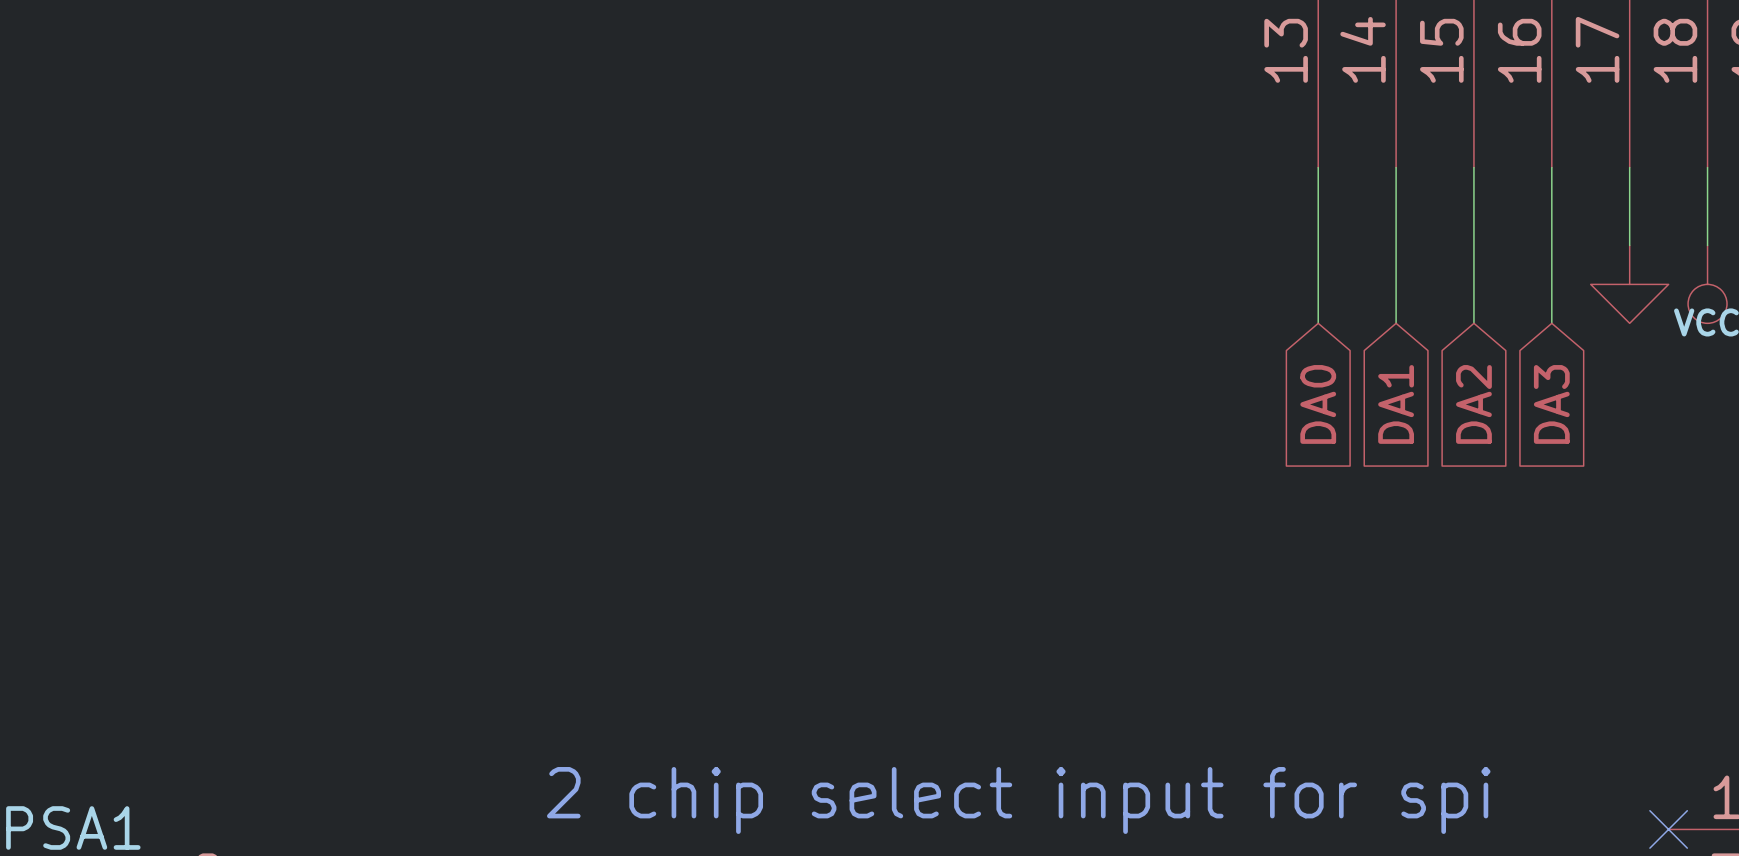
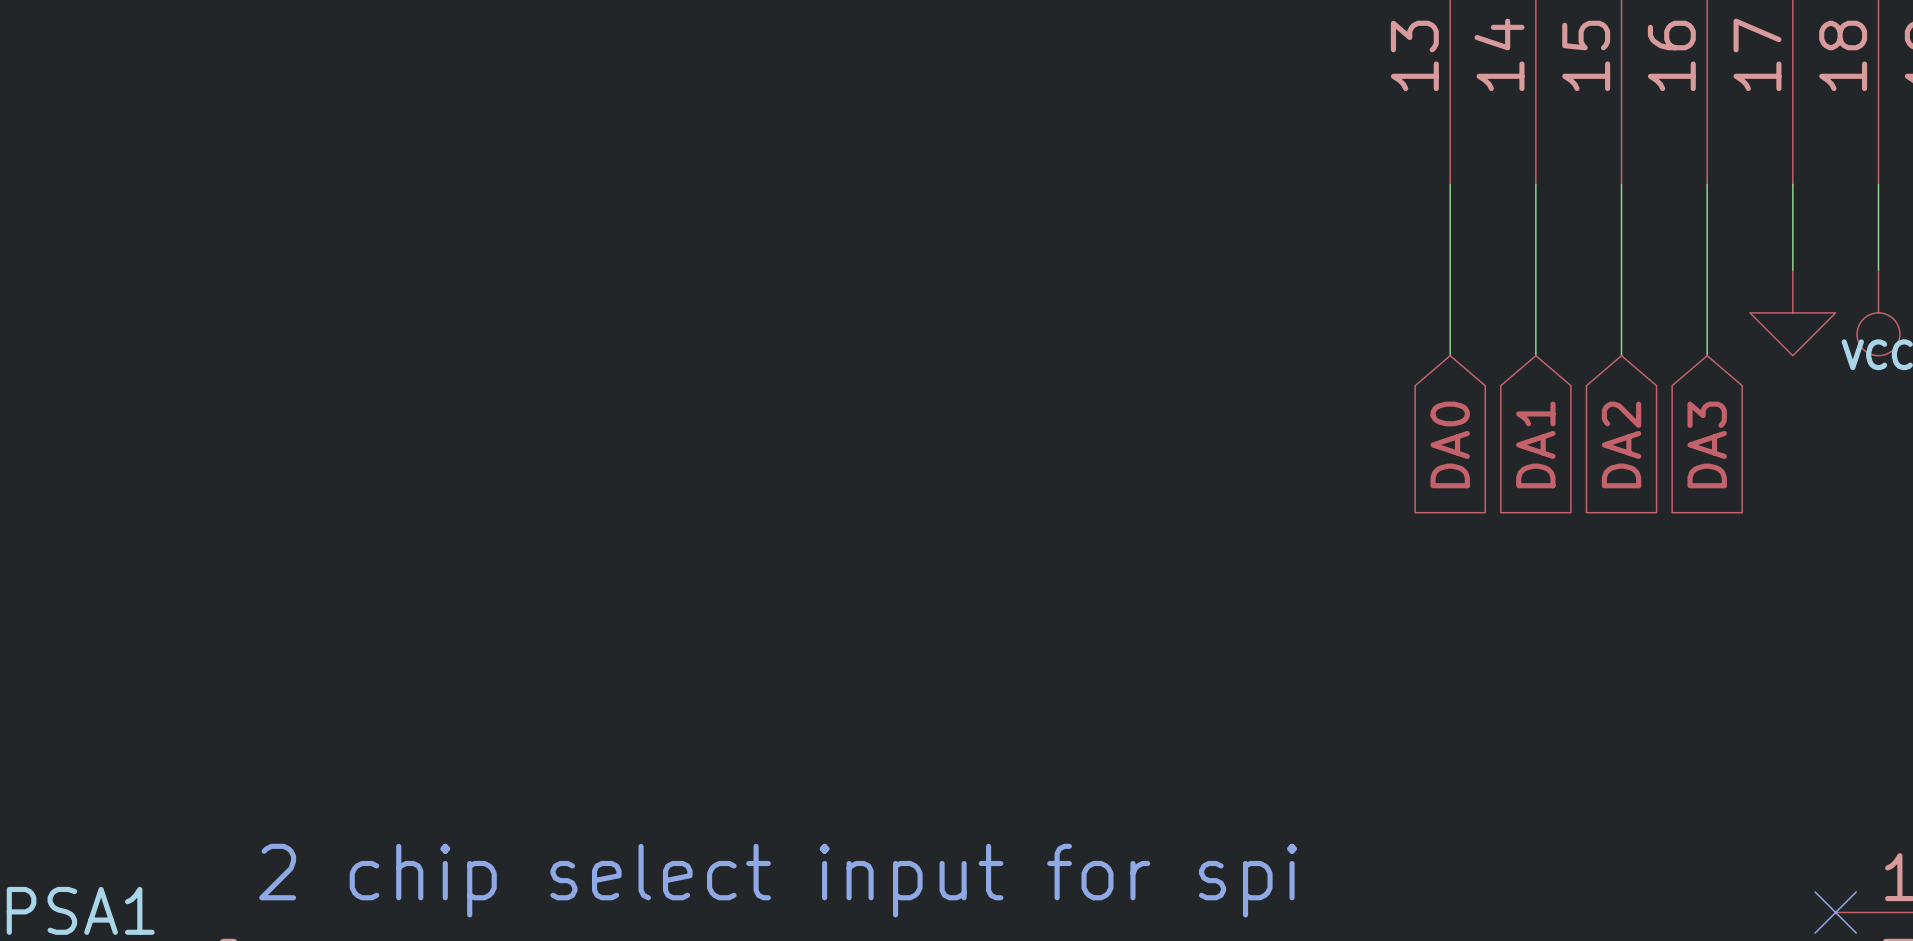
text position: 2 chip select input for spi (1018, 800) -> 2 chip select input for spi (778, 880)

